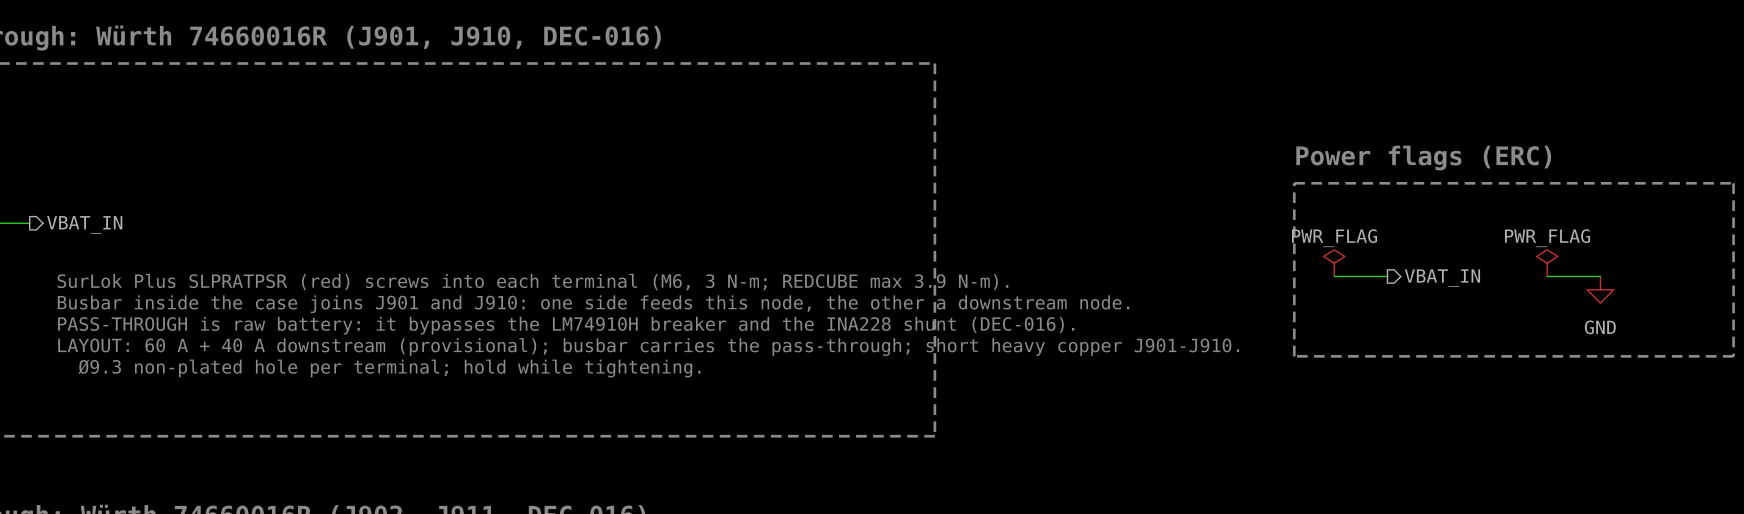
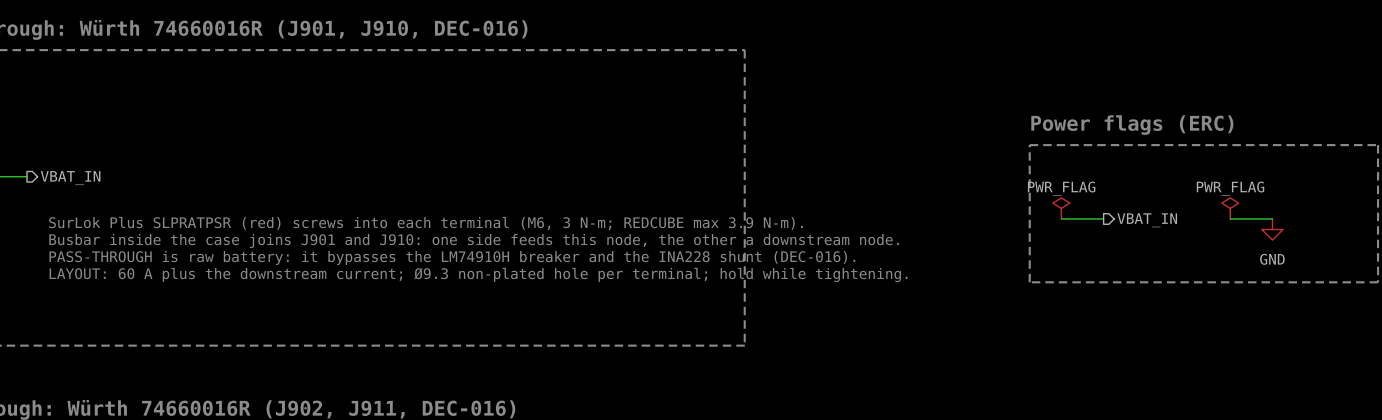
text: LAYOUT: 60 A + 40 A downstream (provisional); busbar carries the pass-through; short heavy copper J901-J910. (648, 347) -> LAYOUT: 60 A plus the downstream current; Ø9.3 non-plated hole per terminal; hold while tightening. (478, 274)
text: Ø9.3 non-plated hole per terminal; hold while tightening. (389, 368) -> none

